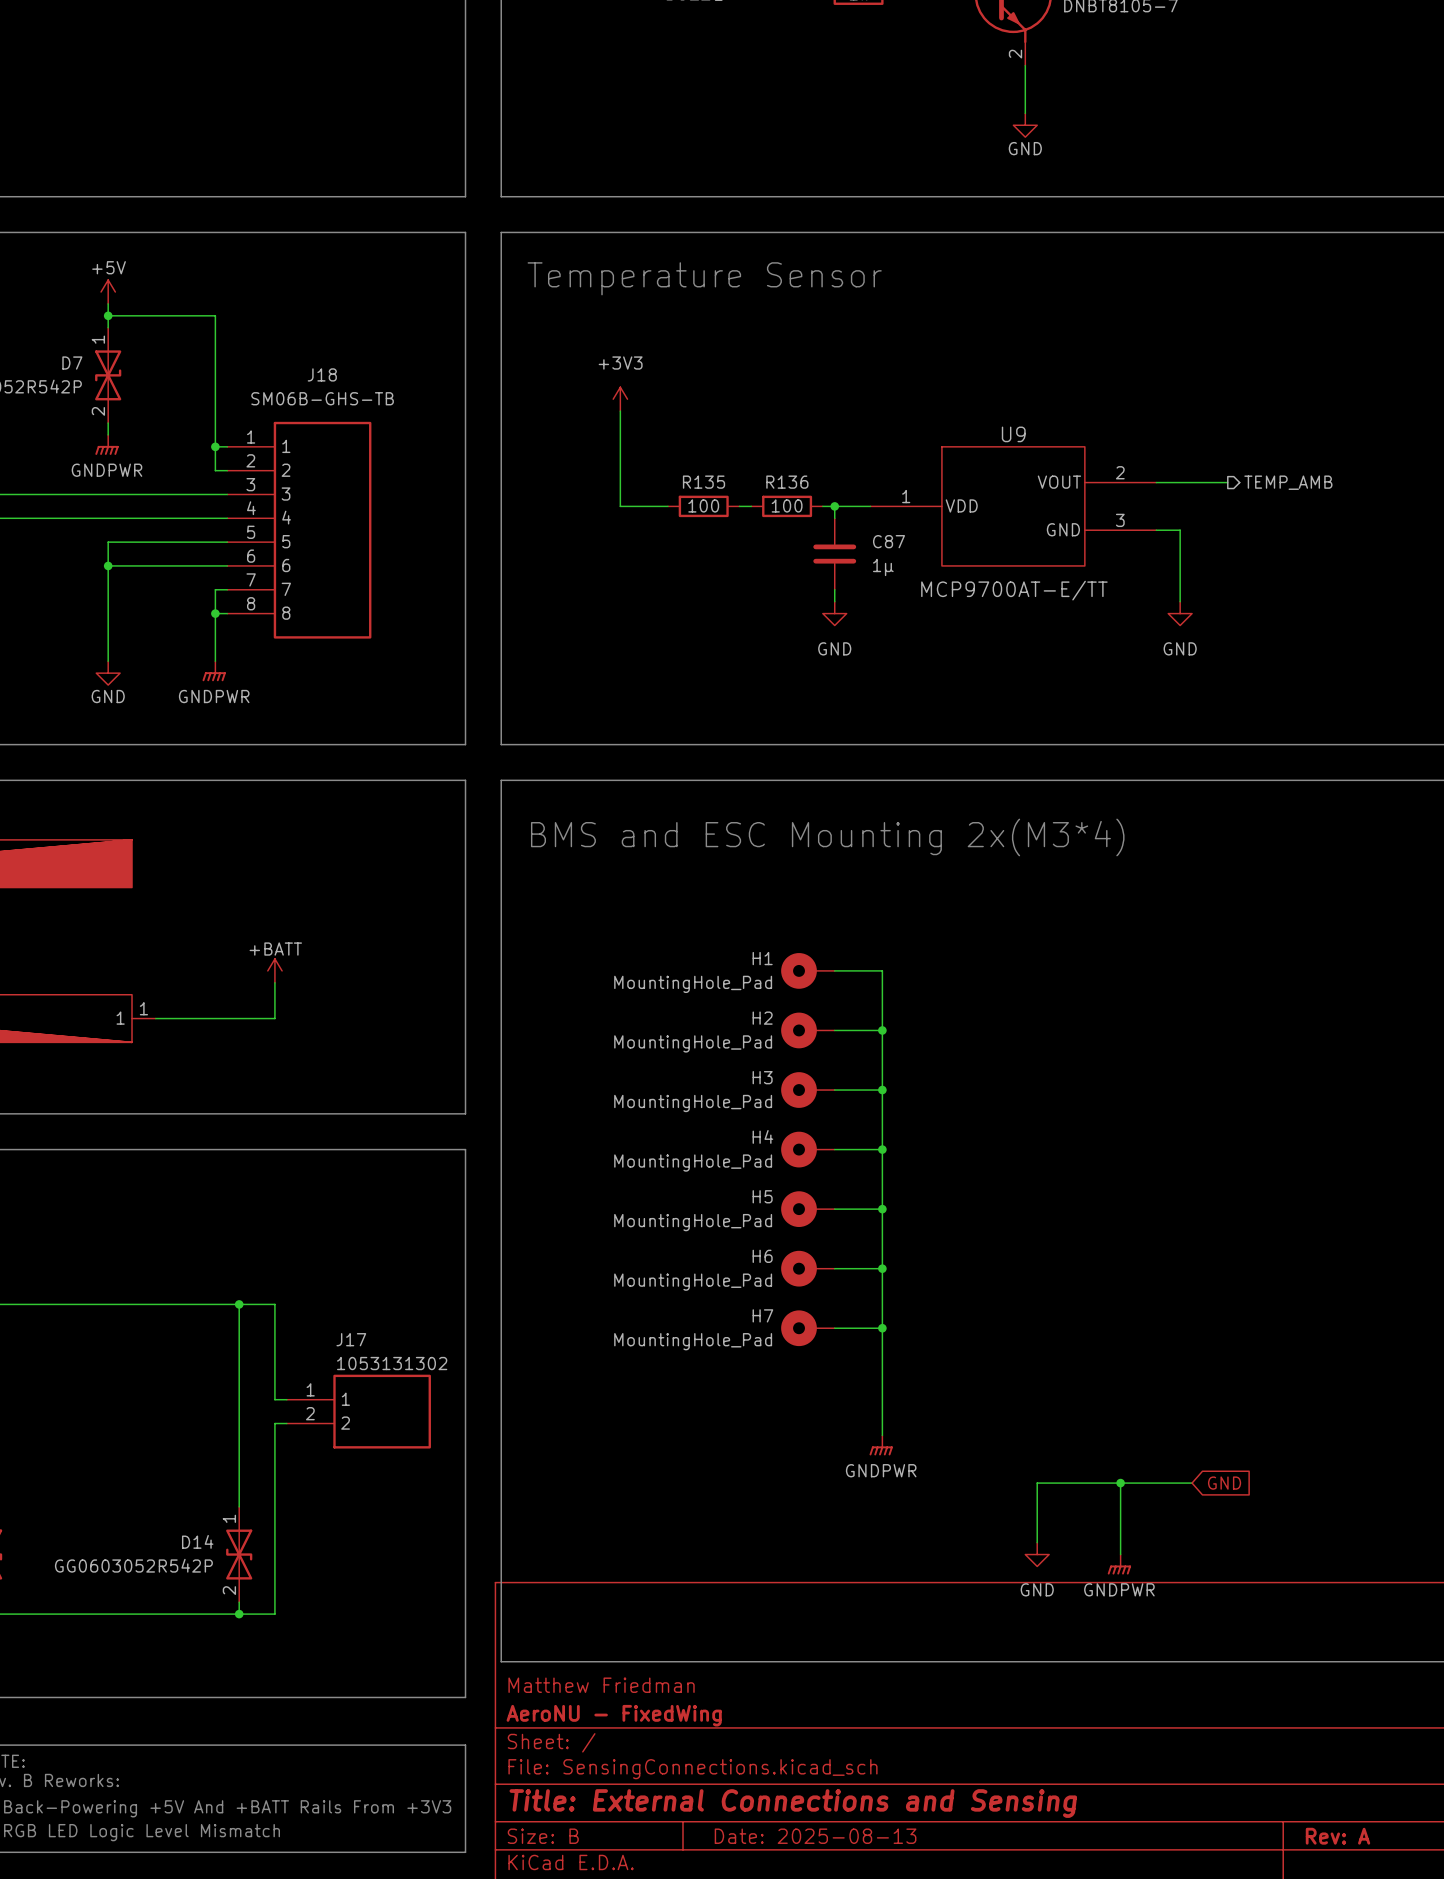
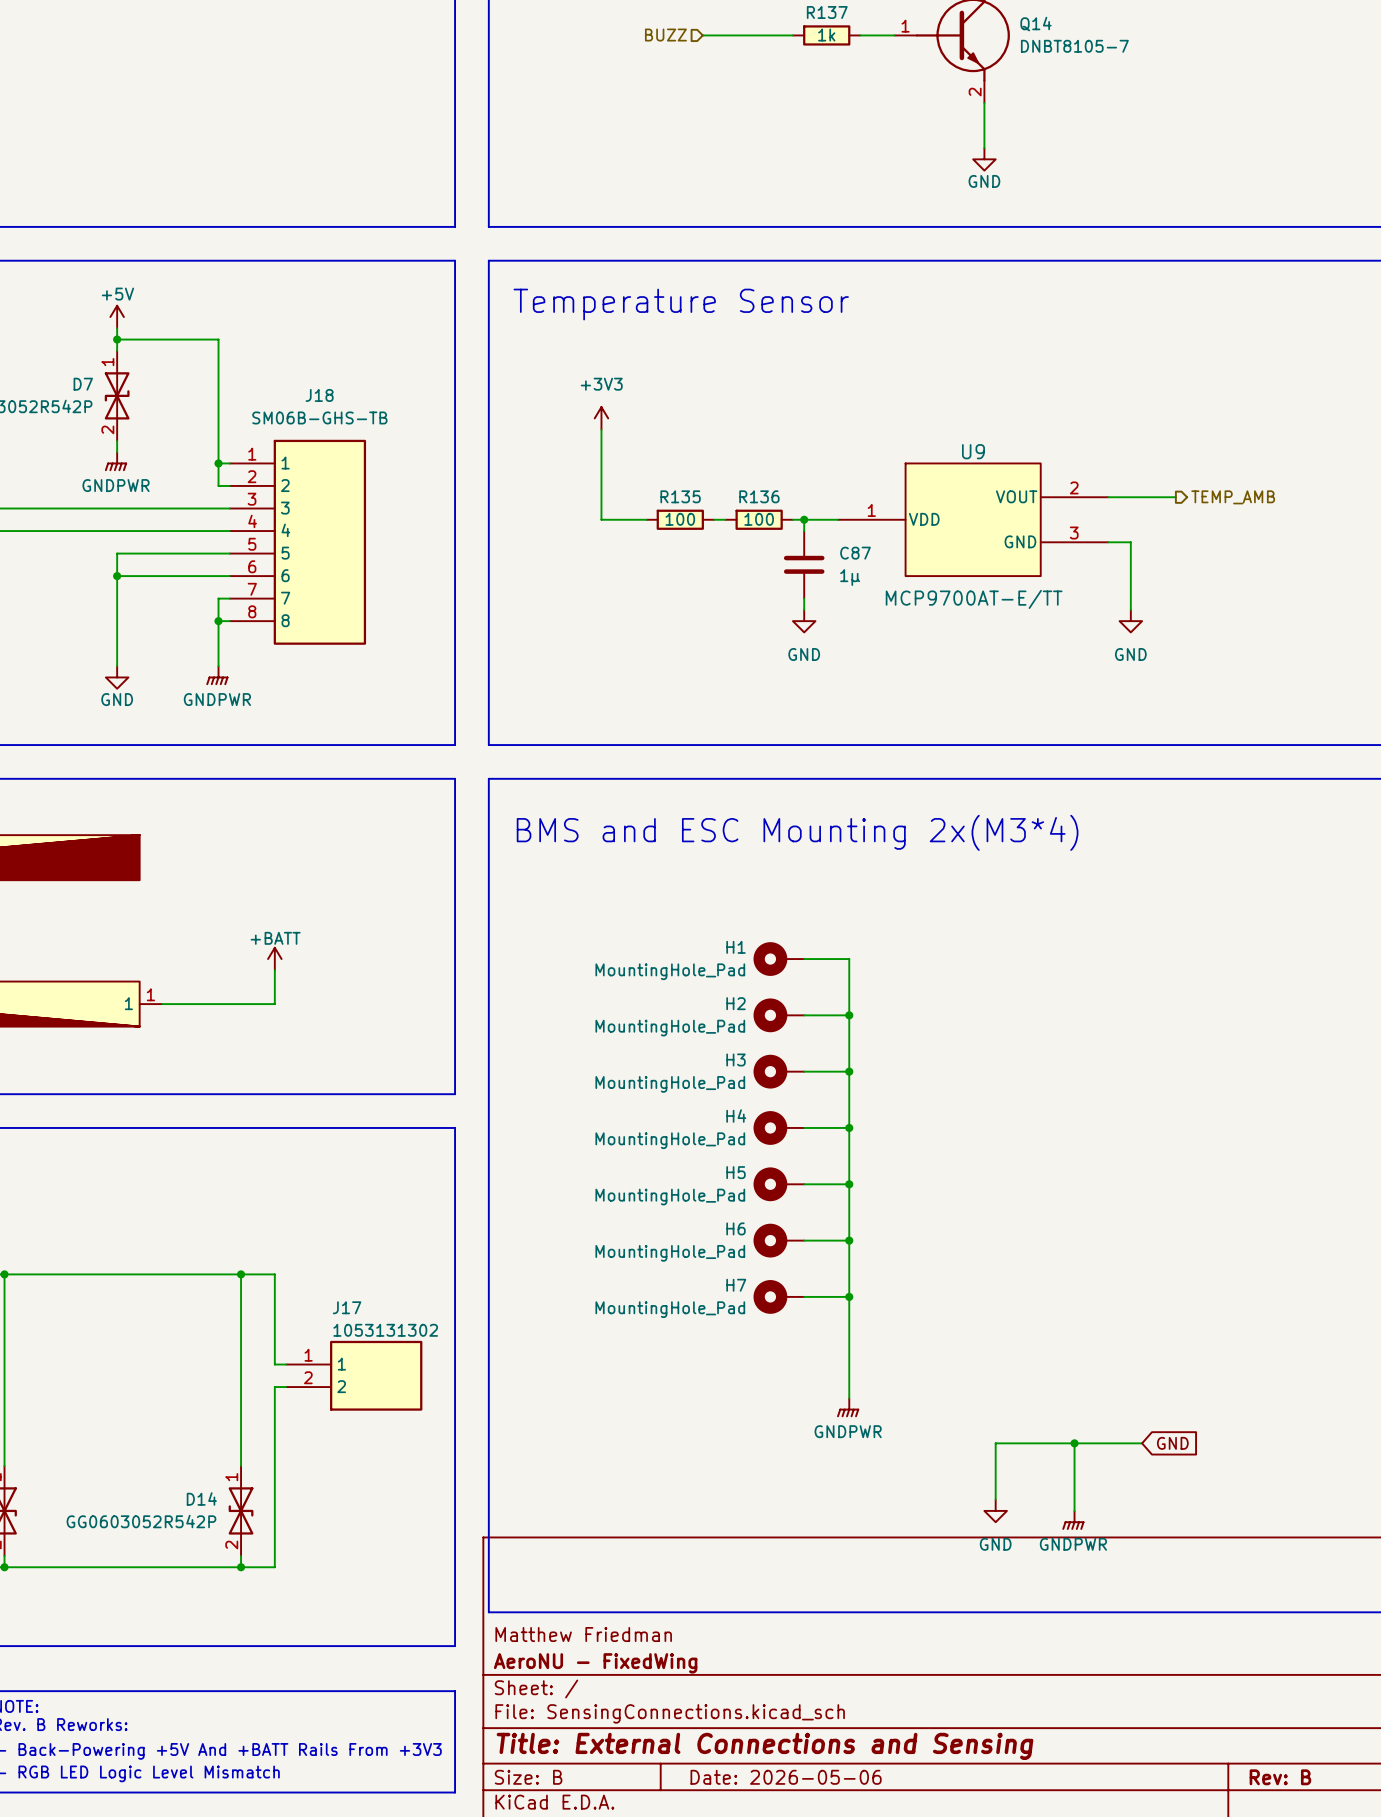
title block: Date: 2025-08-13 (815, 1836) -> Date: 2026-05-06 (786, 1777)
title block: Rev: A (1337, 1836) -> Rev: B (1280, 1777)

